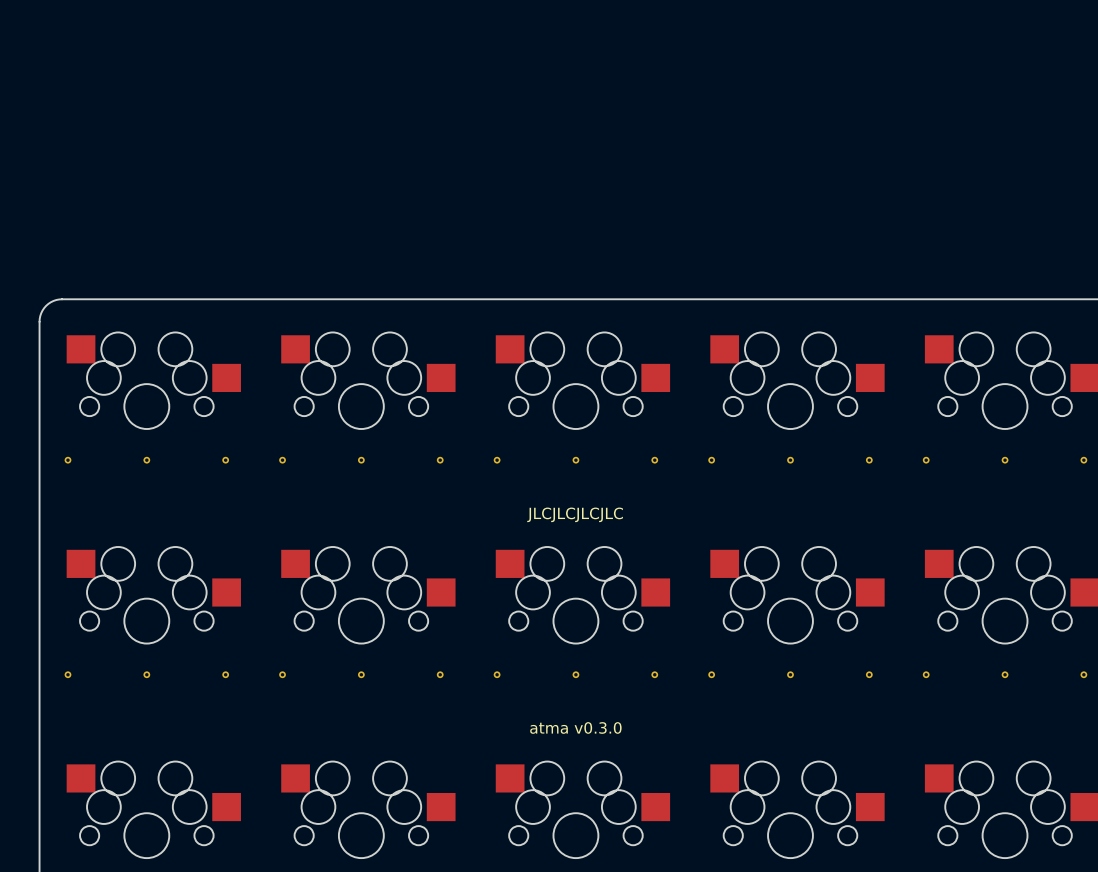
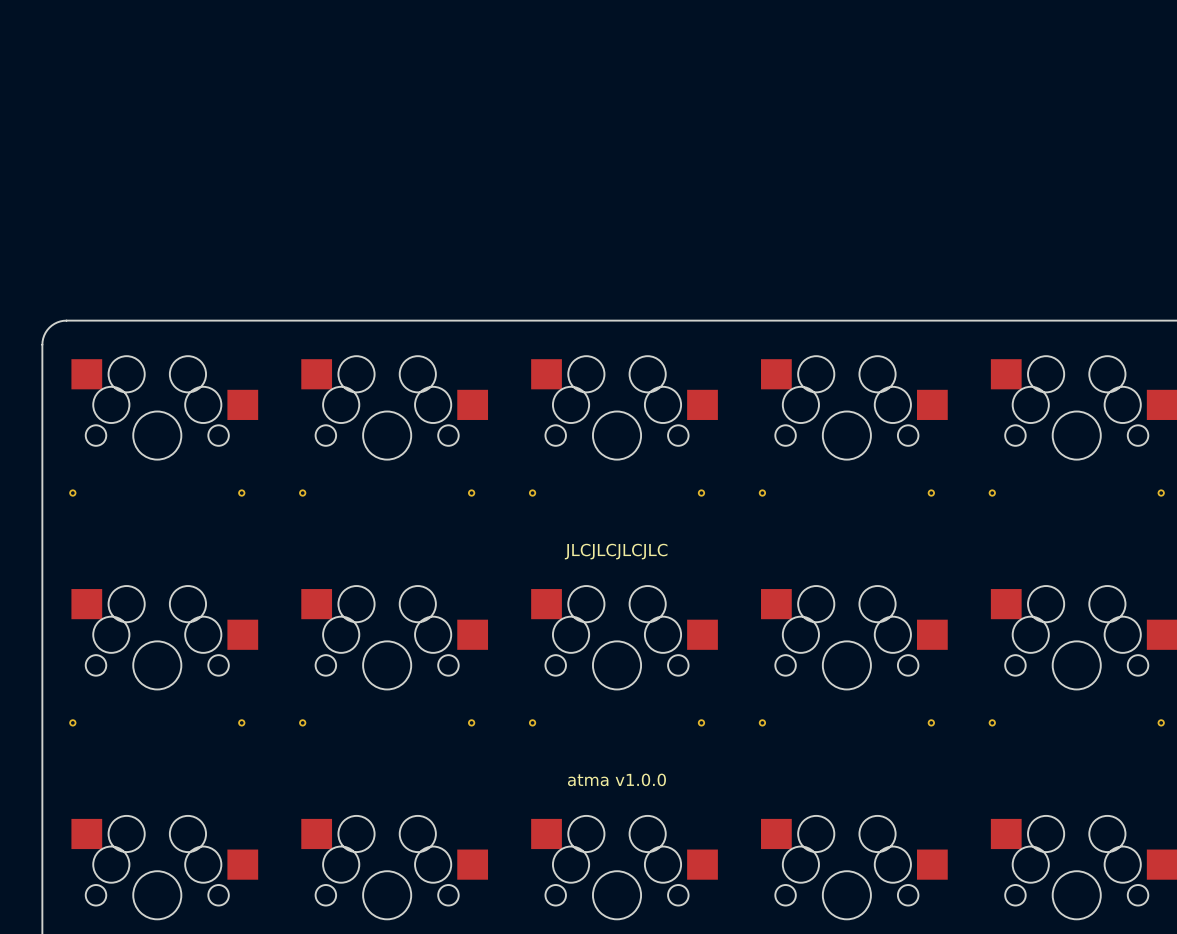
part: (146, 460) -> none
part: (361, 460) -> none
part: (575, 460) -> none
part: (790, 460) -> none
part: (1005, 460) -> none
part: (146, 674) -> none
part: (361, 674) -> none
part: (575, 674) -> none
part: (790, 674) -> none
part: (1005, 674) -> none
text: atma v0.3.0 (575, 727) -> atma v1.0.0 (616, 779)

